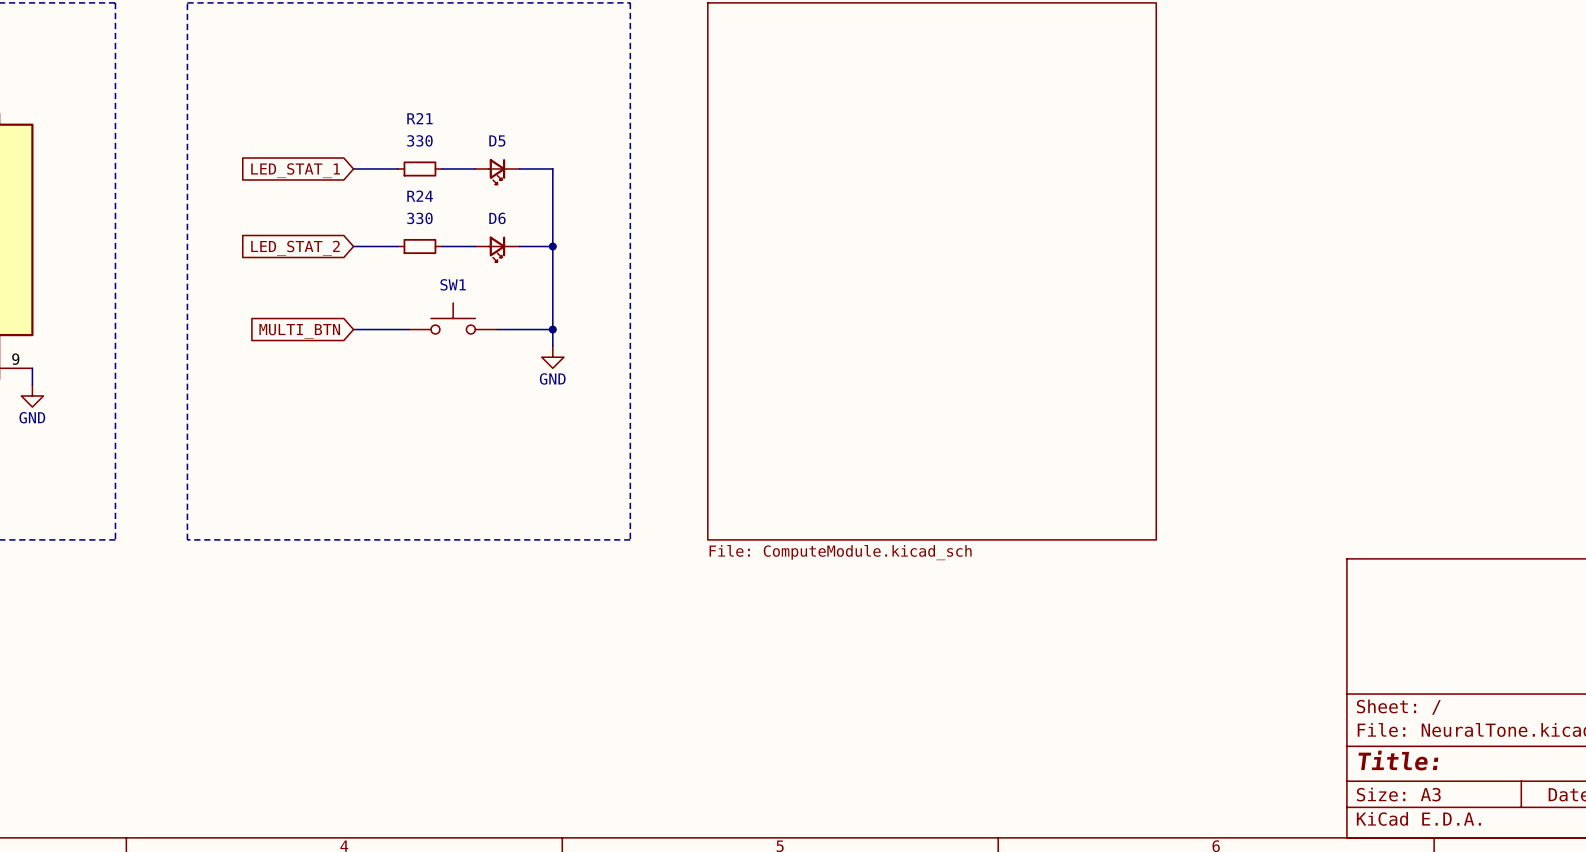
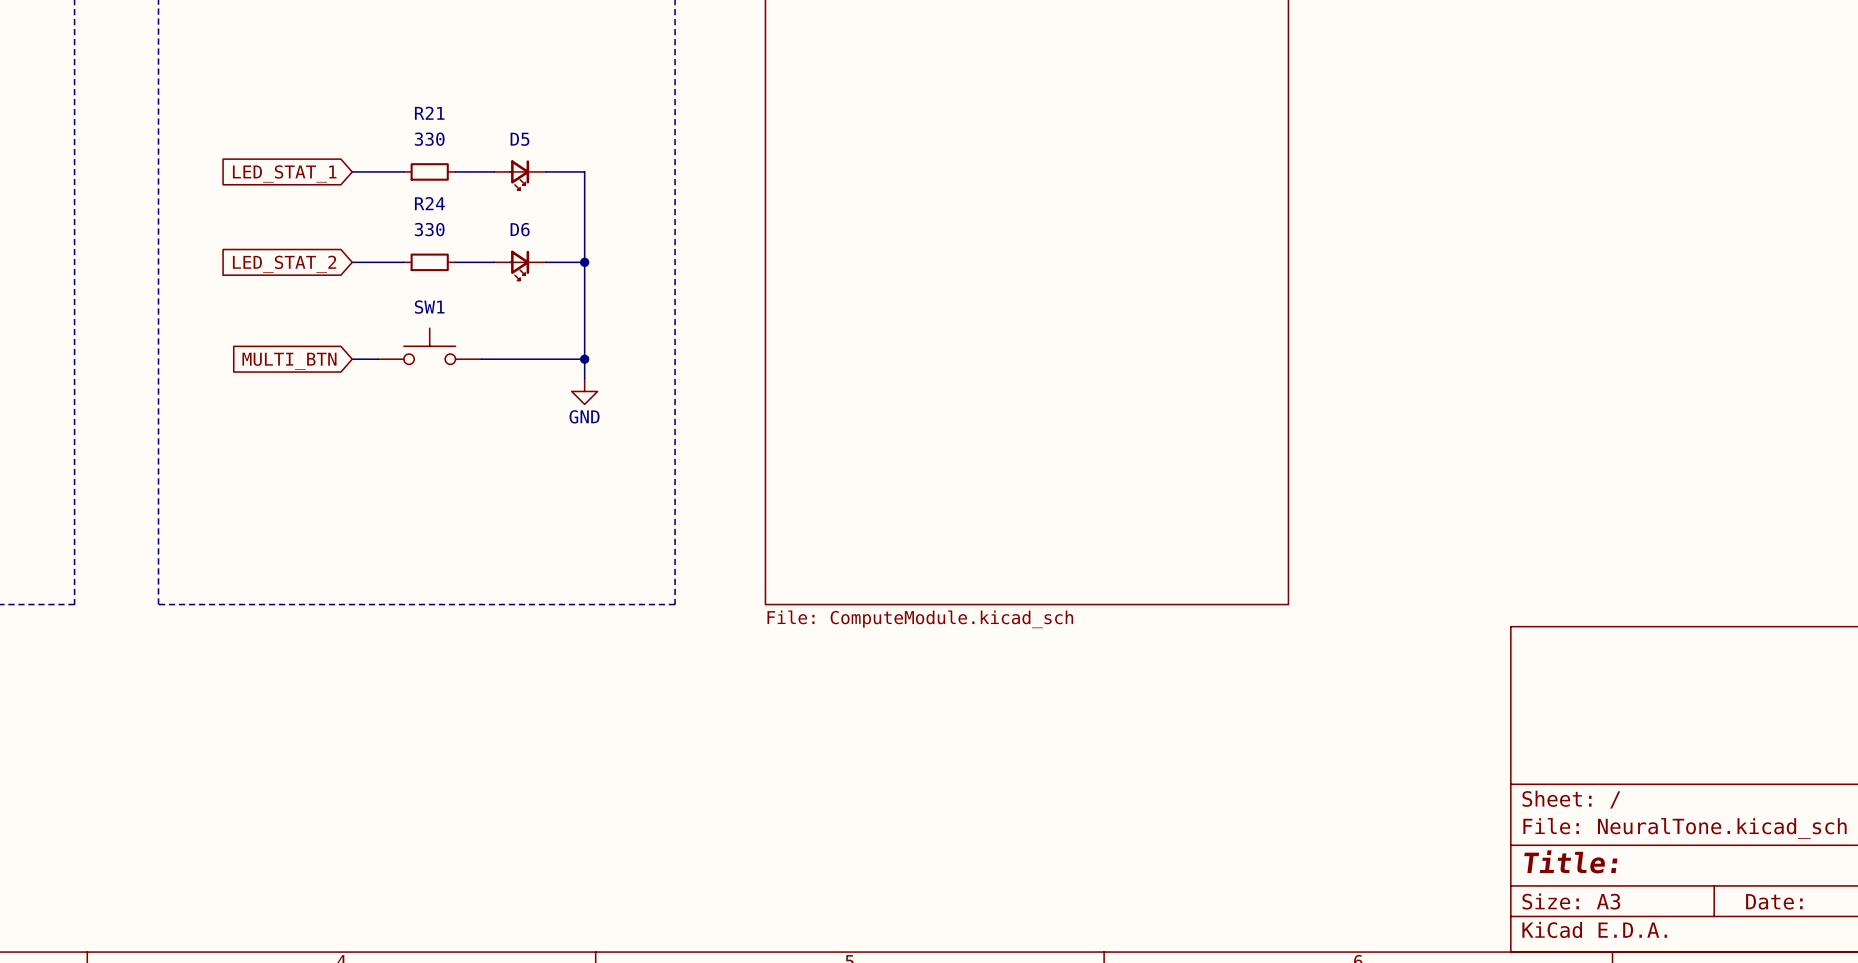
SW1 position: (453, 318) -> (429, 346)

